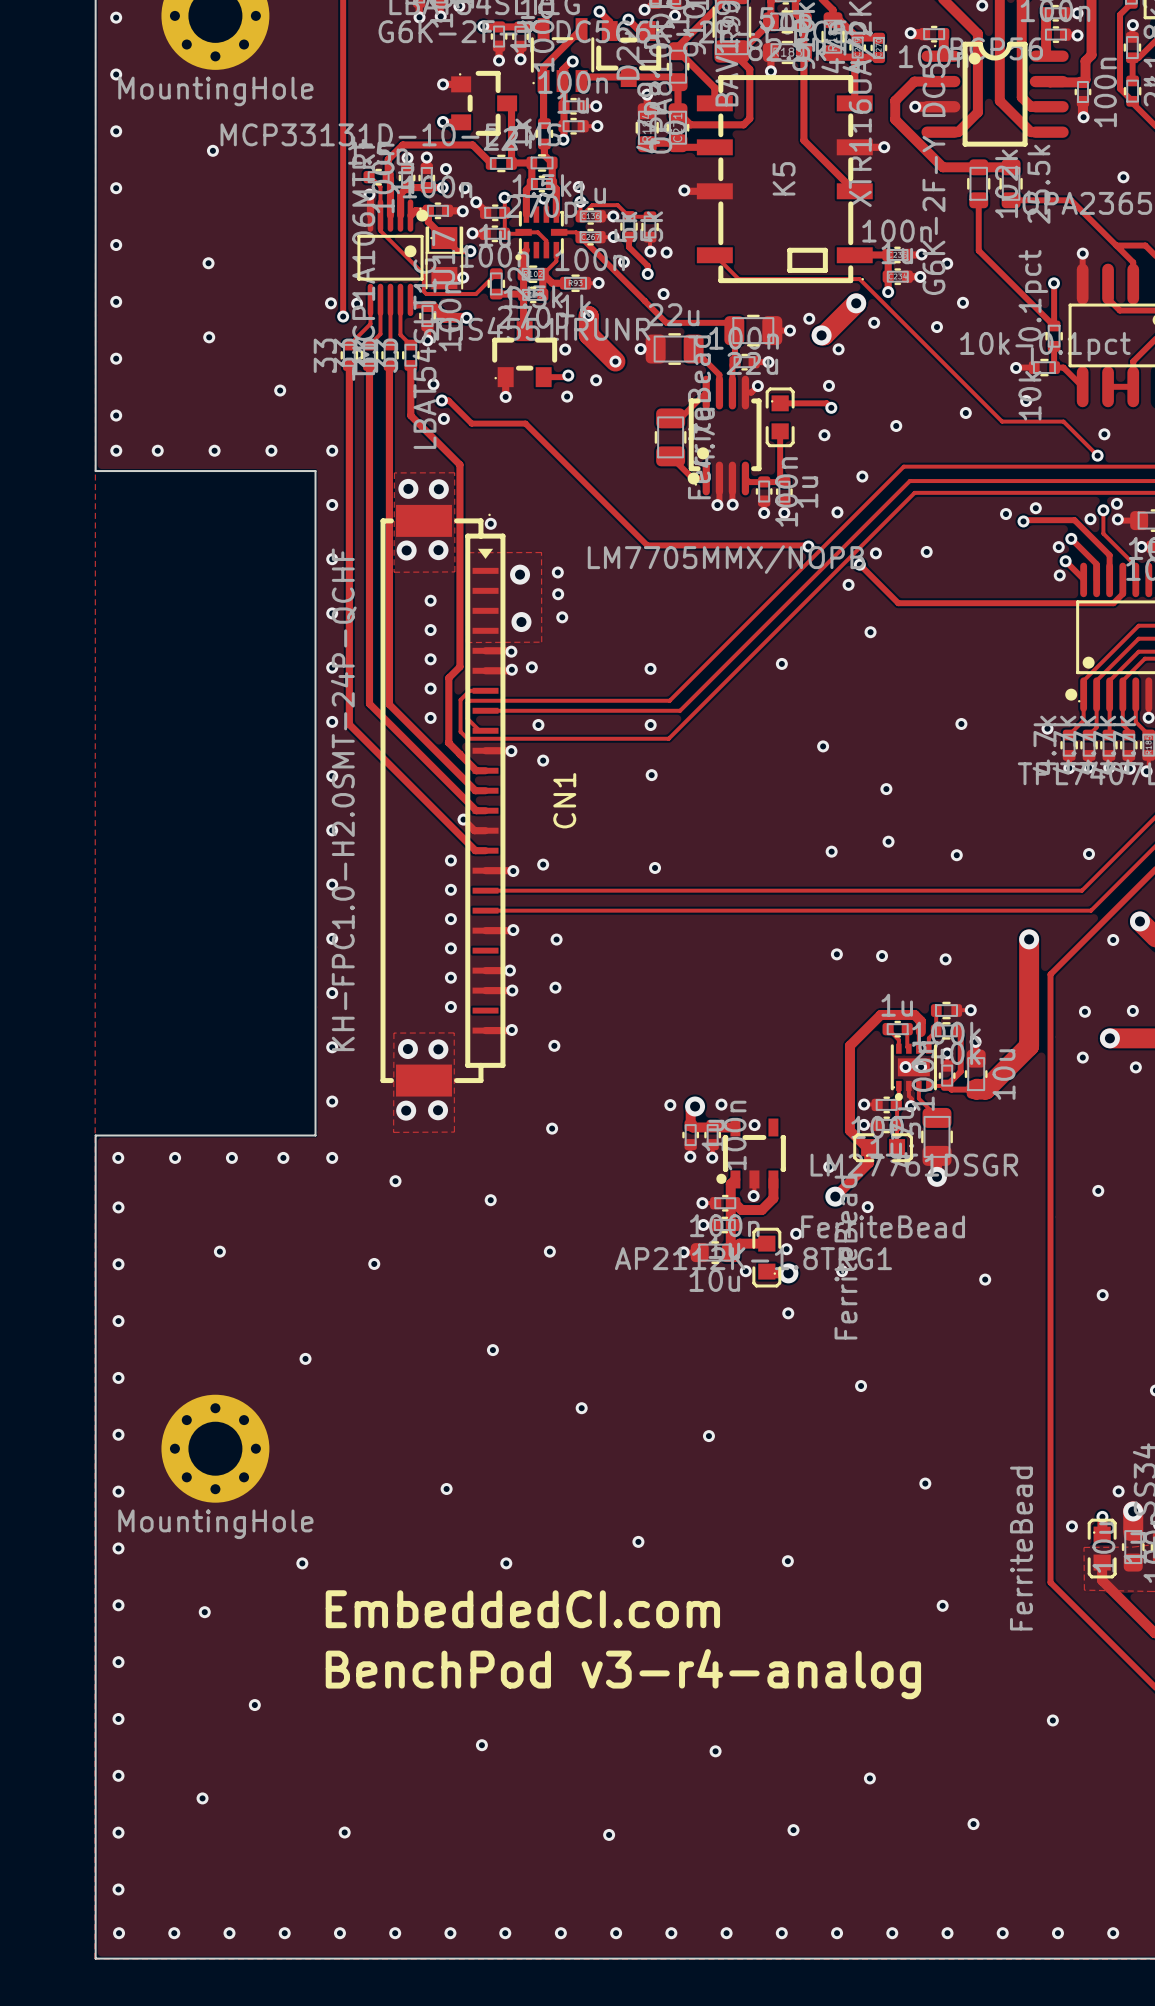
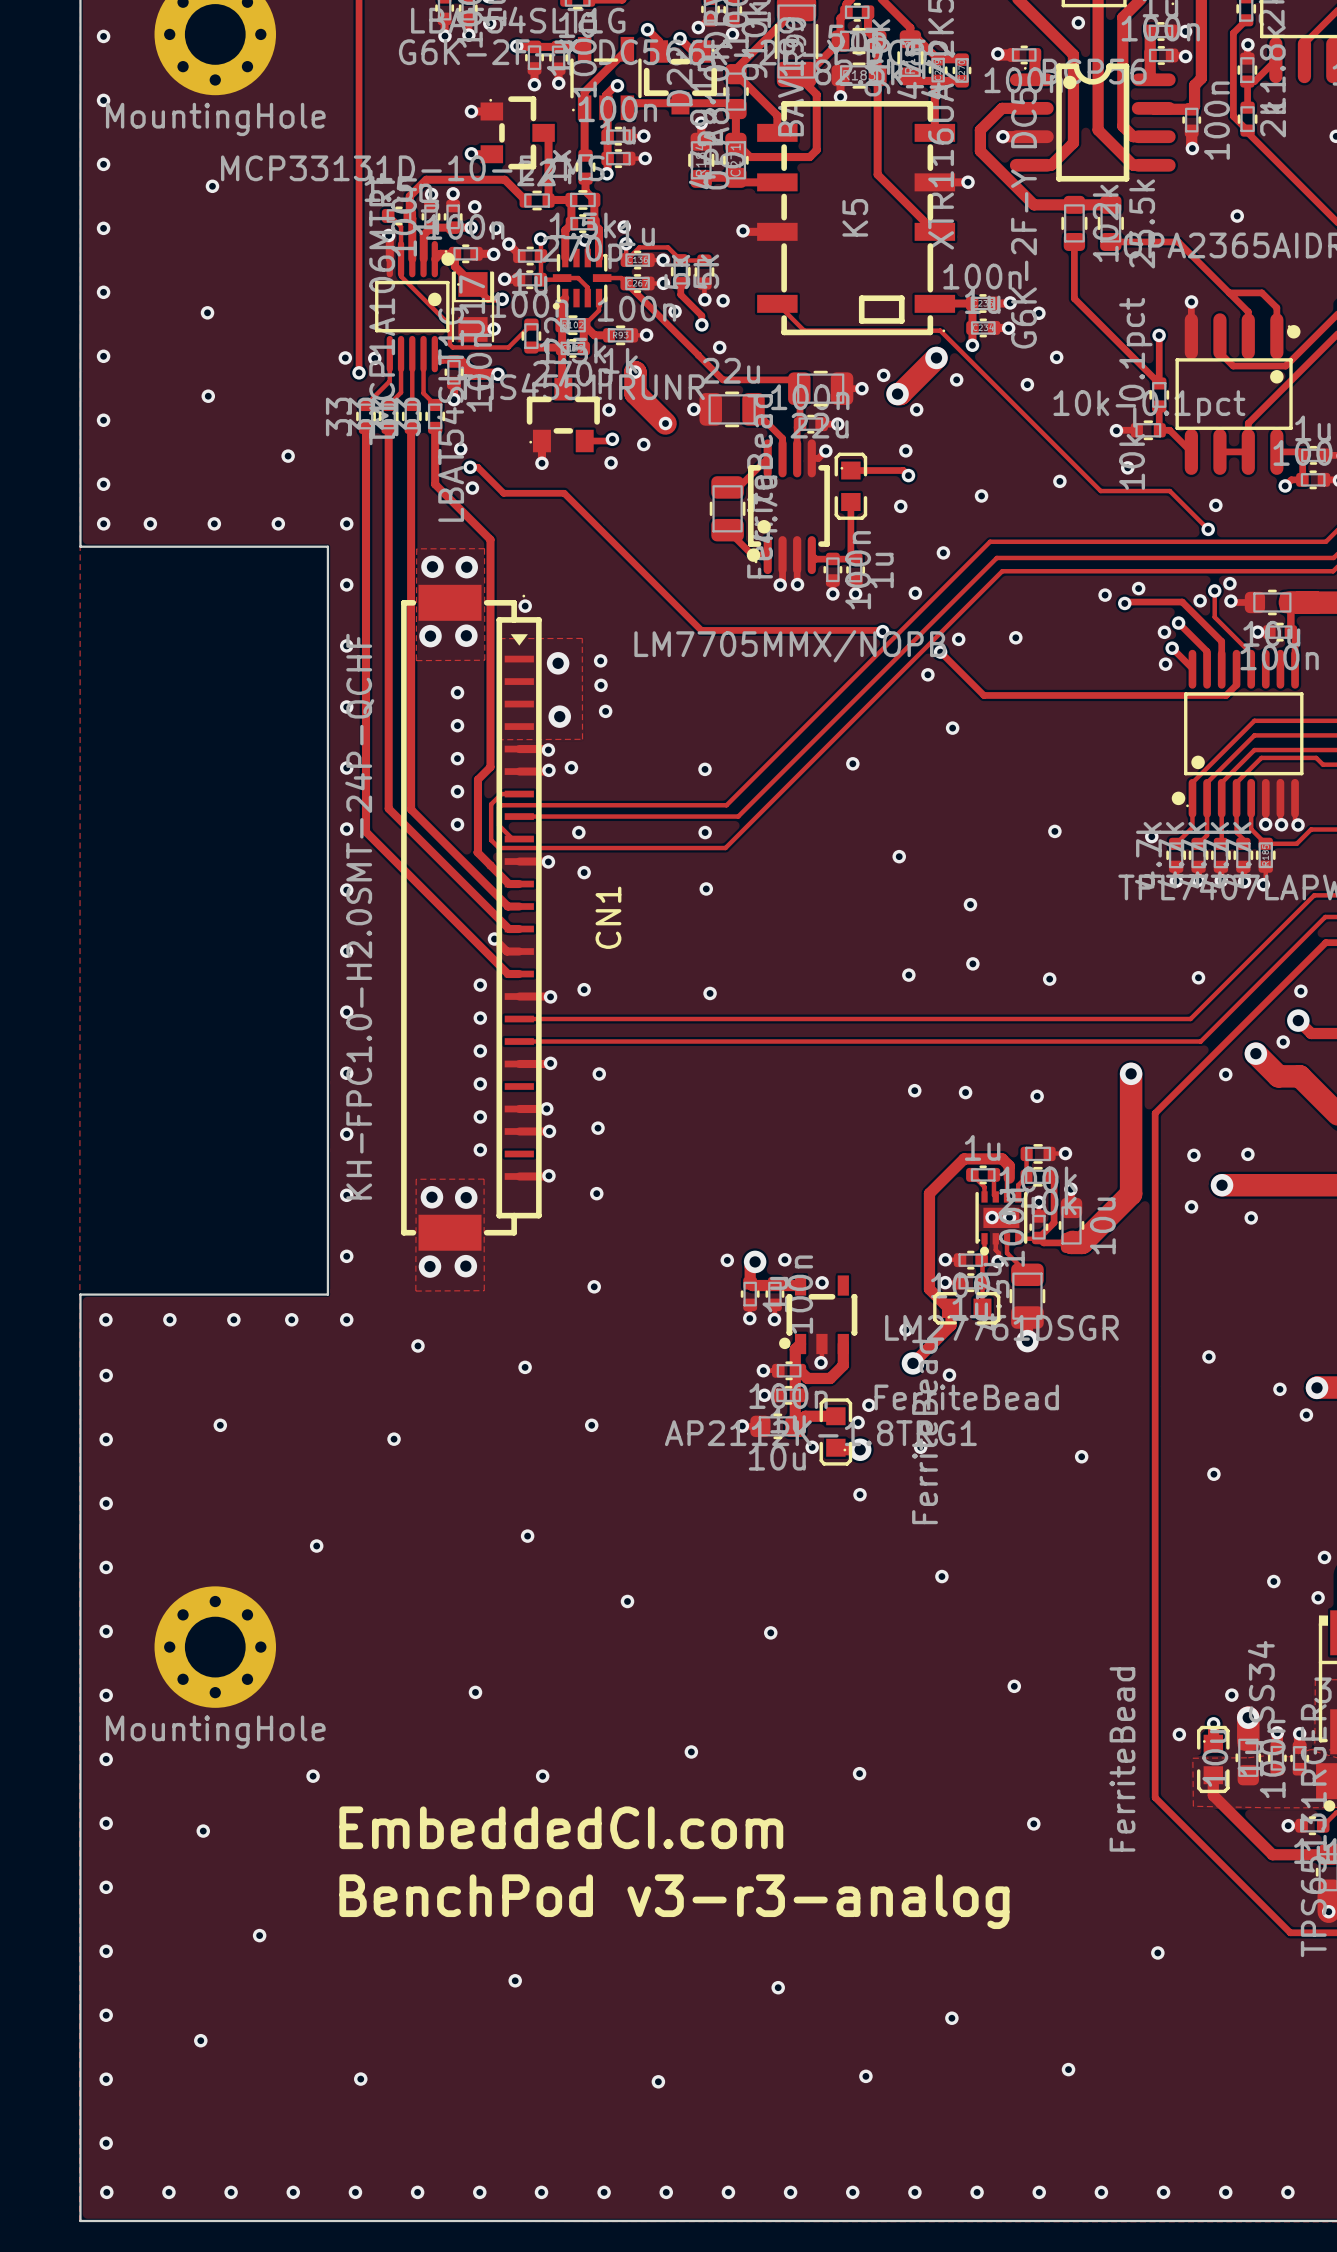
text: BenchPod v3-r4-analog (623, 1674) -> BenchPod v3-r3-analog (674, 1901)

